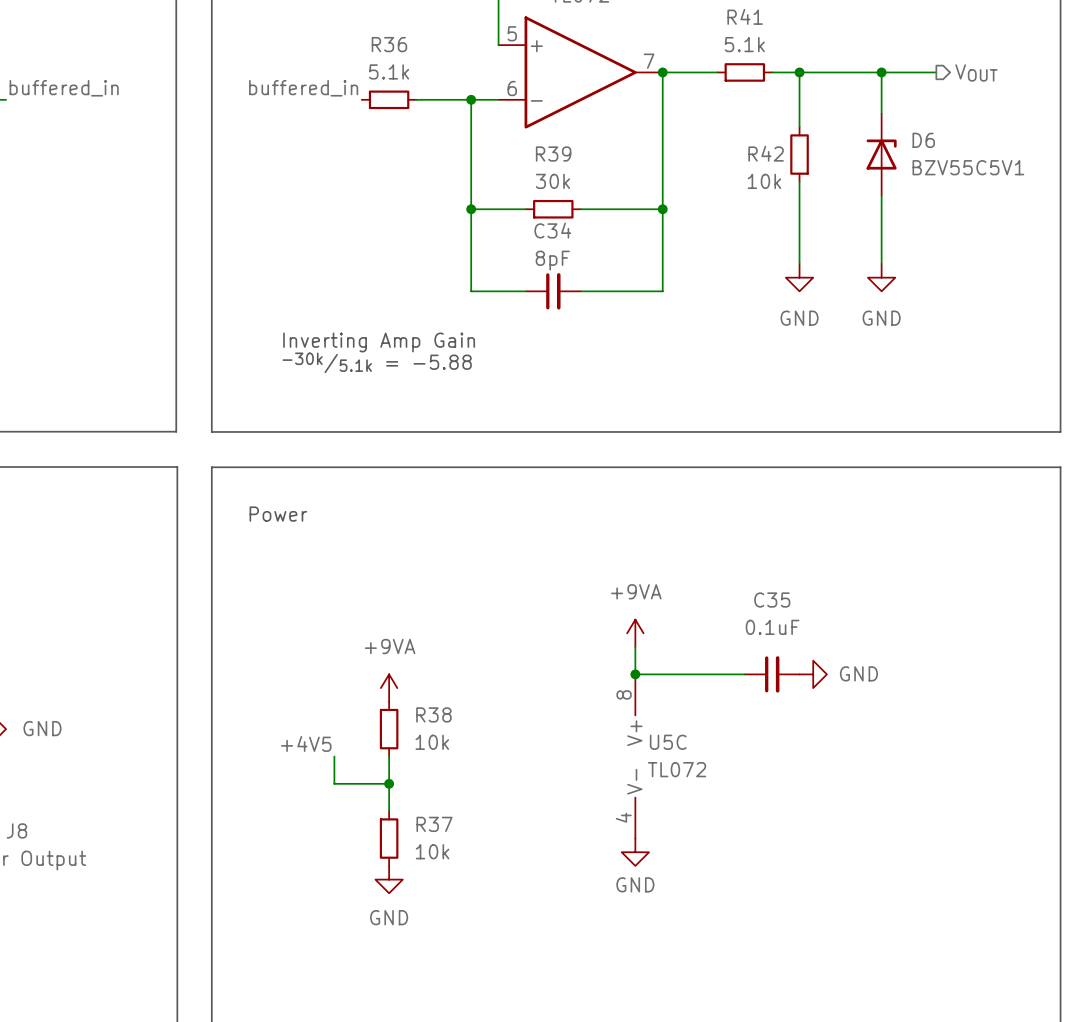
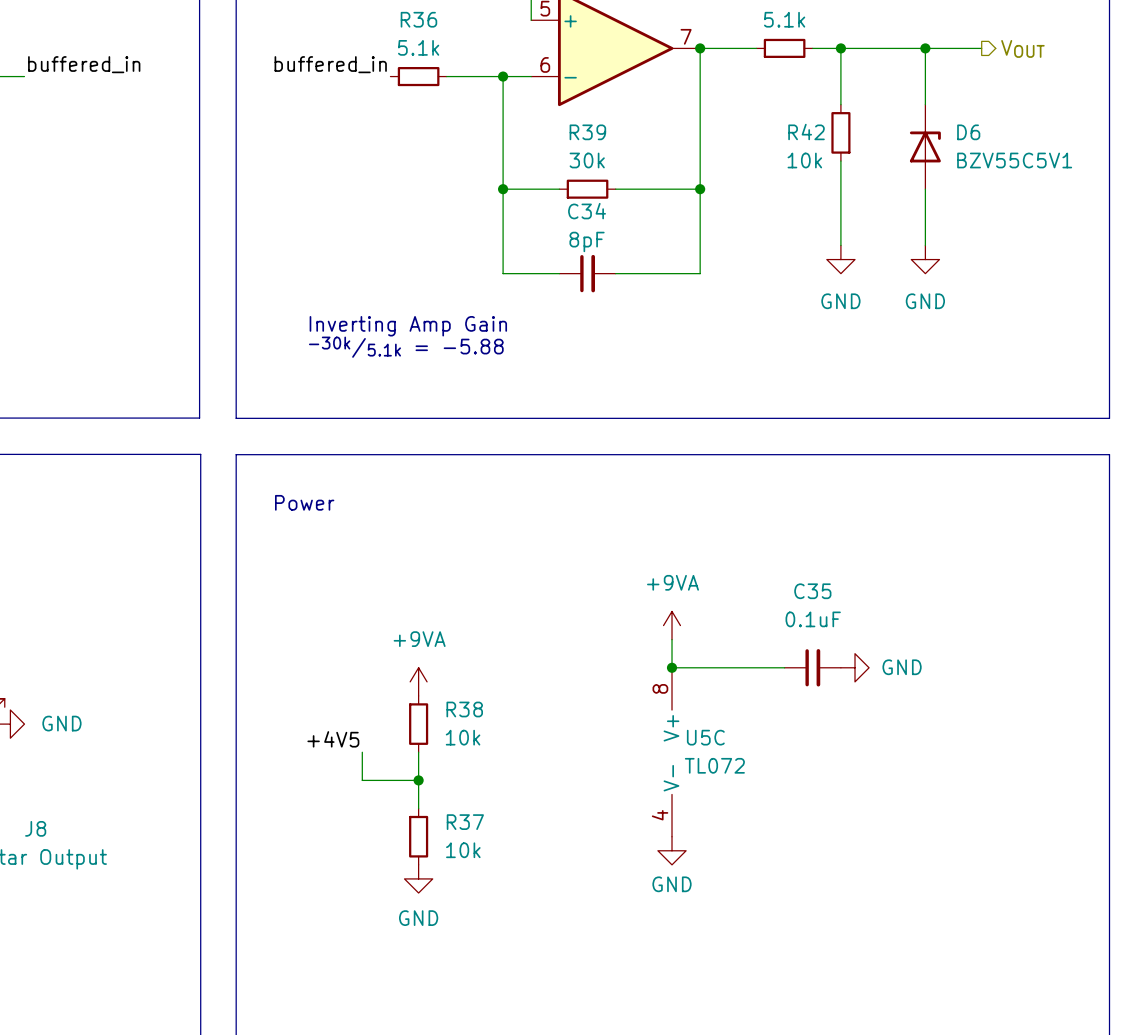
D6 position: (881, 154) -> (925, 146)

